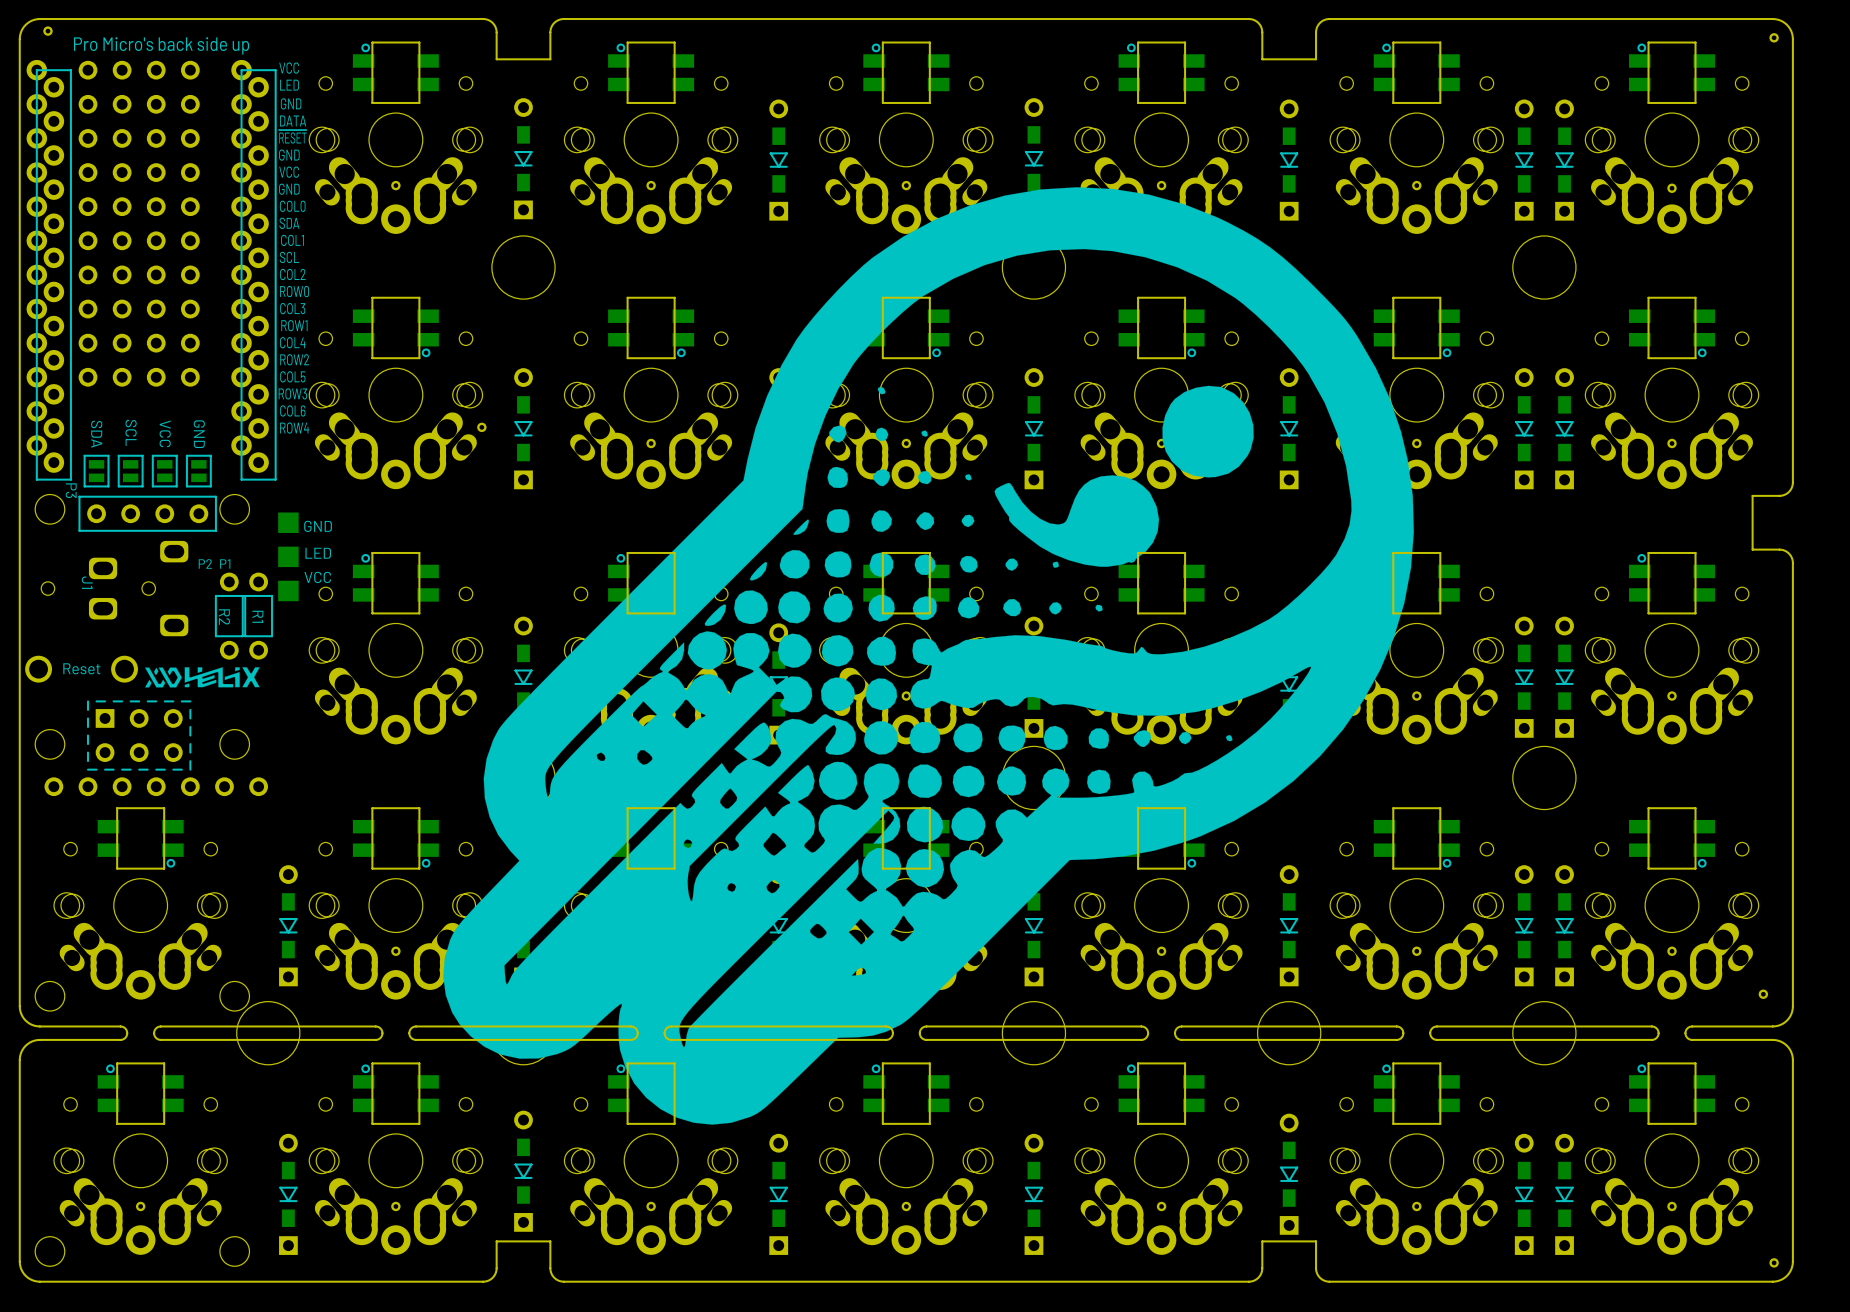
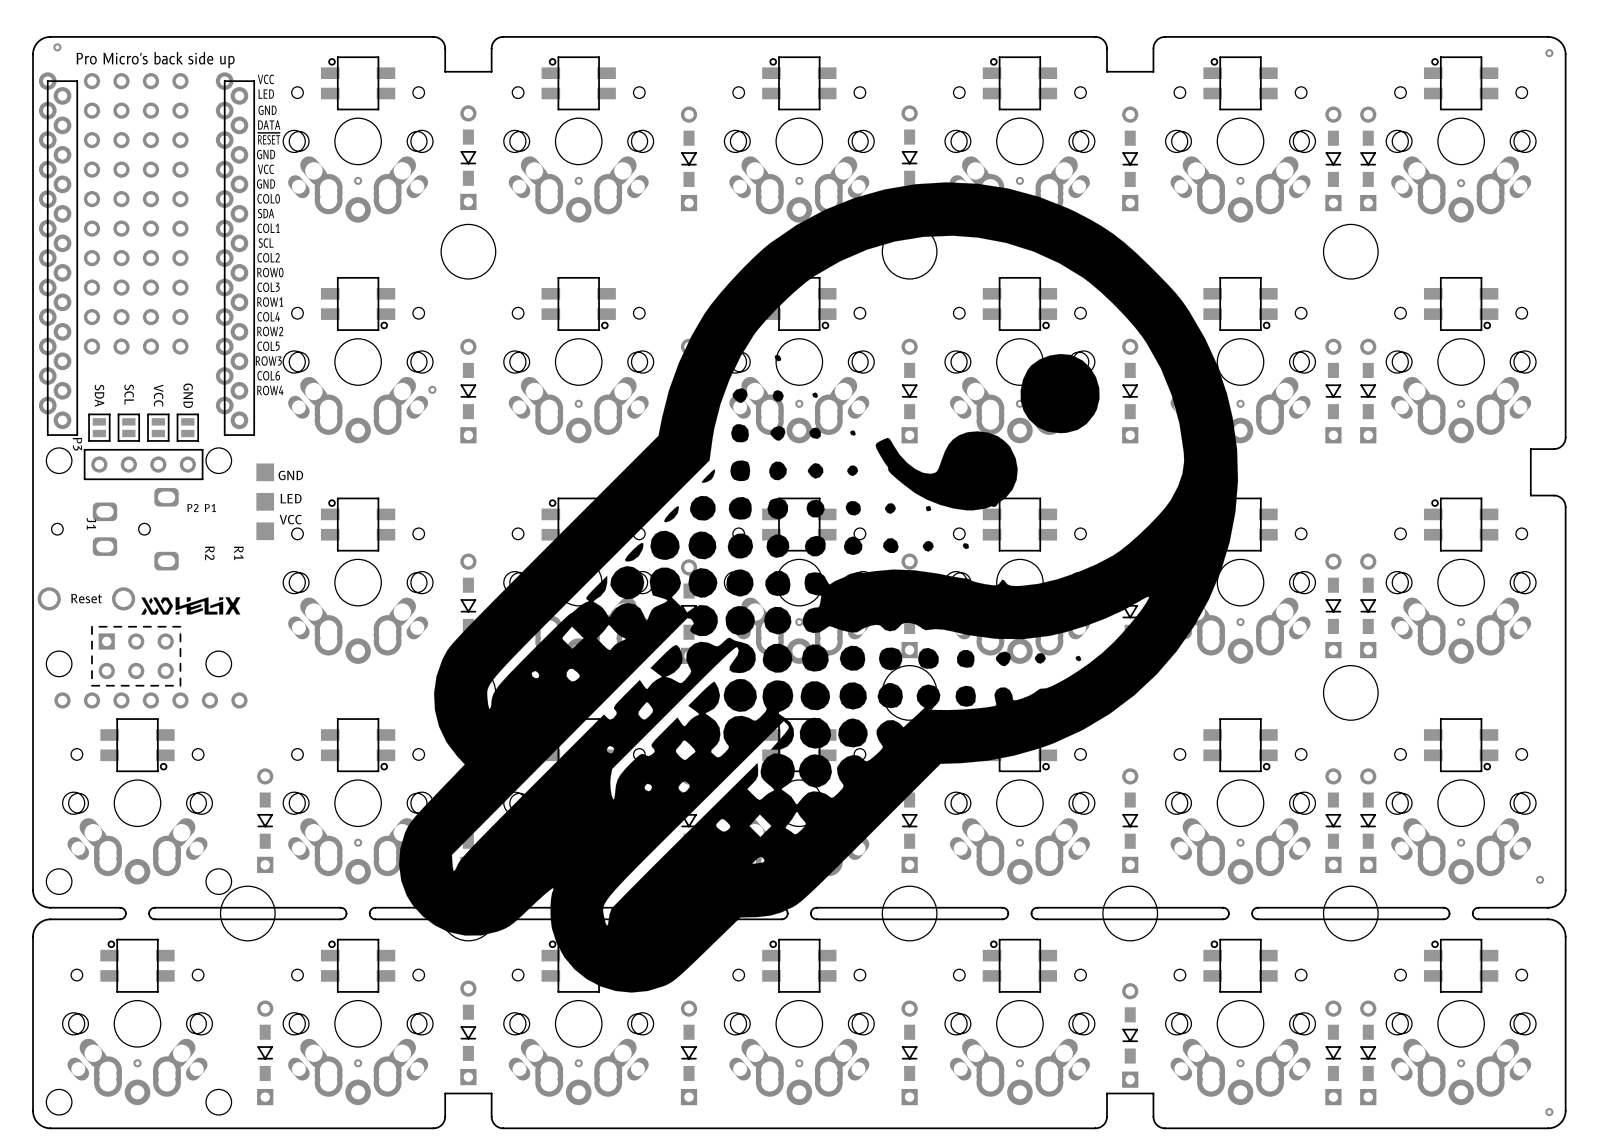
part: (229, 616) -> none
part: (258, 616) -> none

